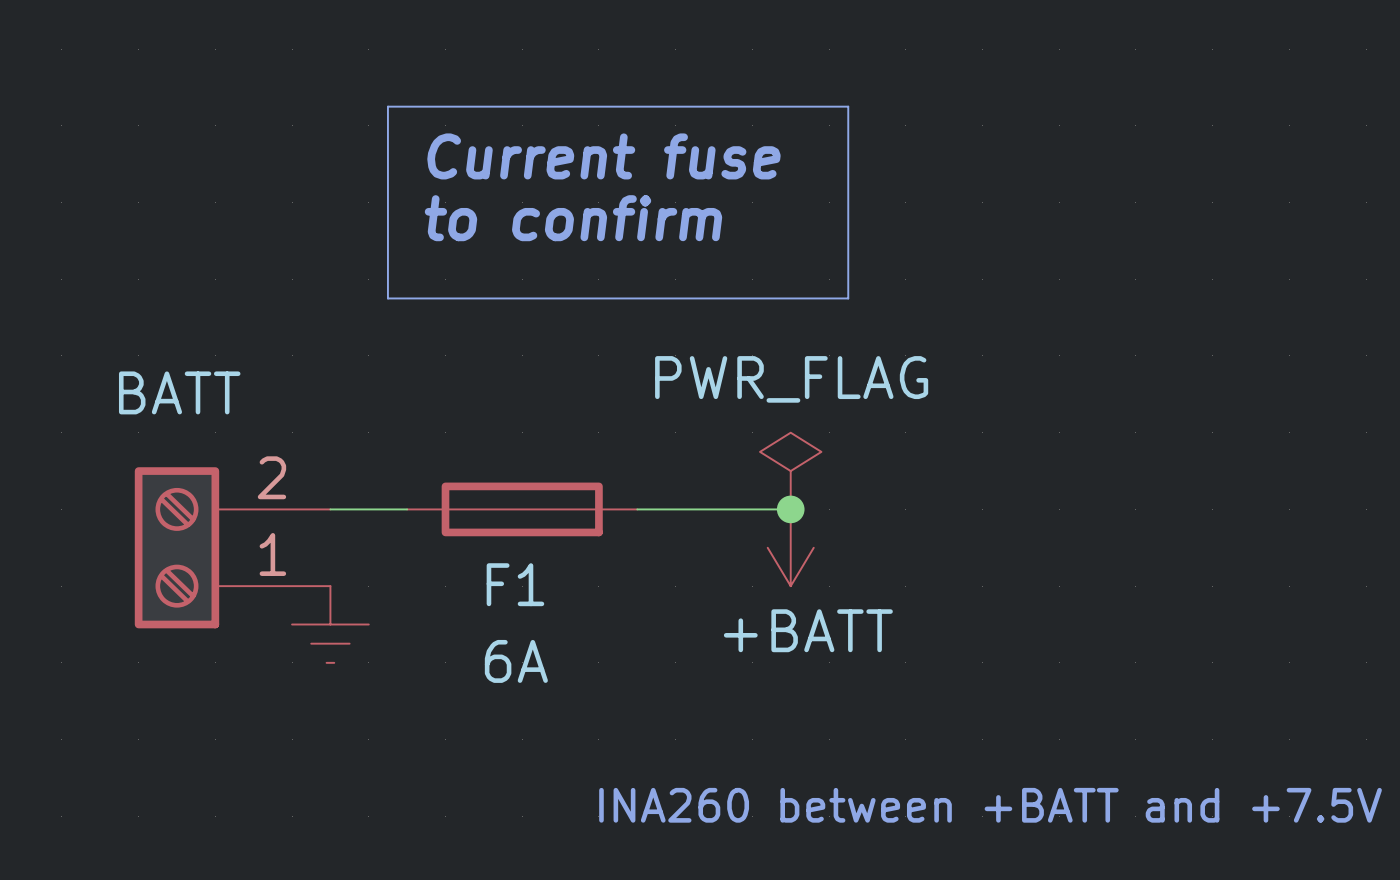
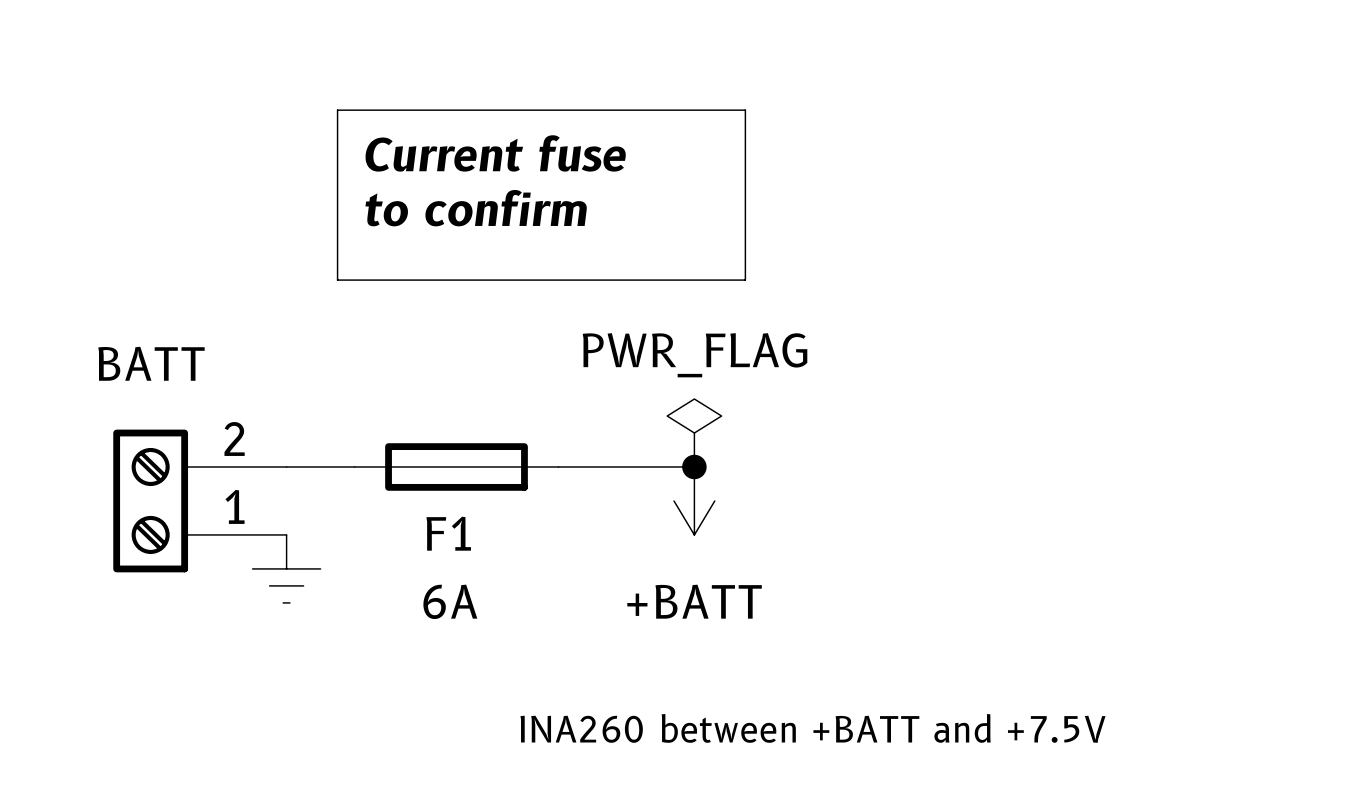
power symbol text position: +BATT (808, 630) -> +BATT (694, 601)

